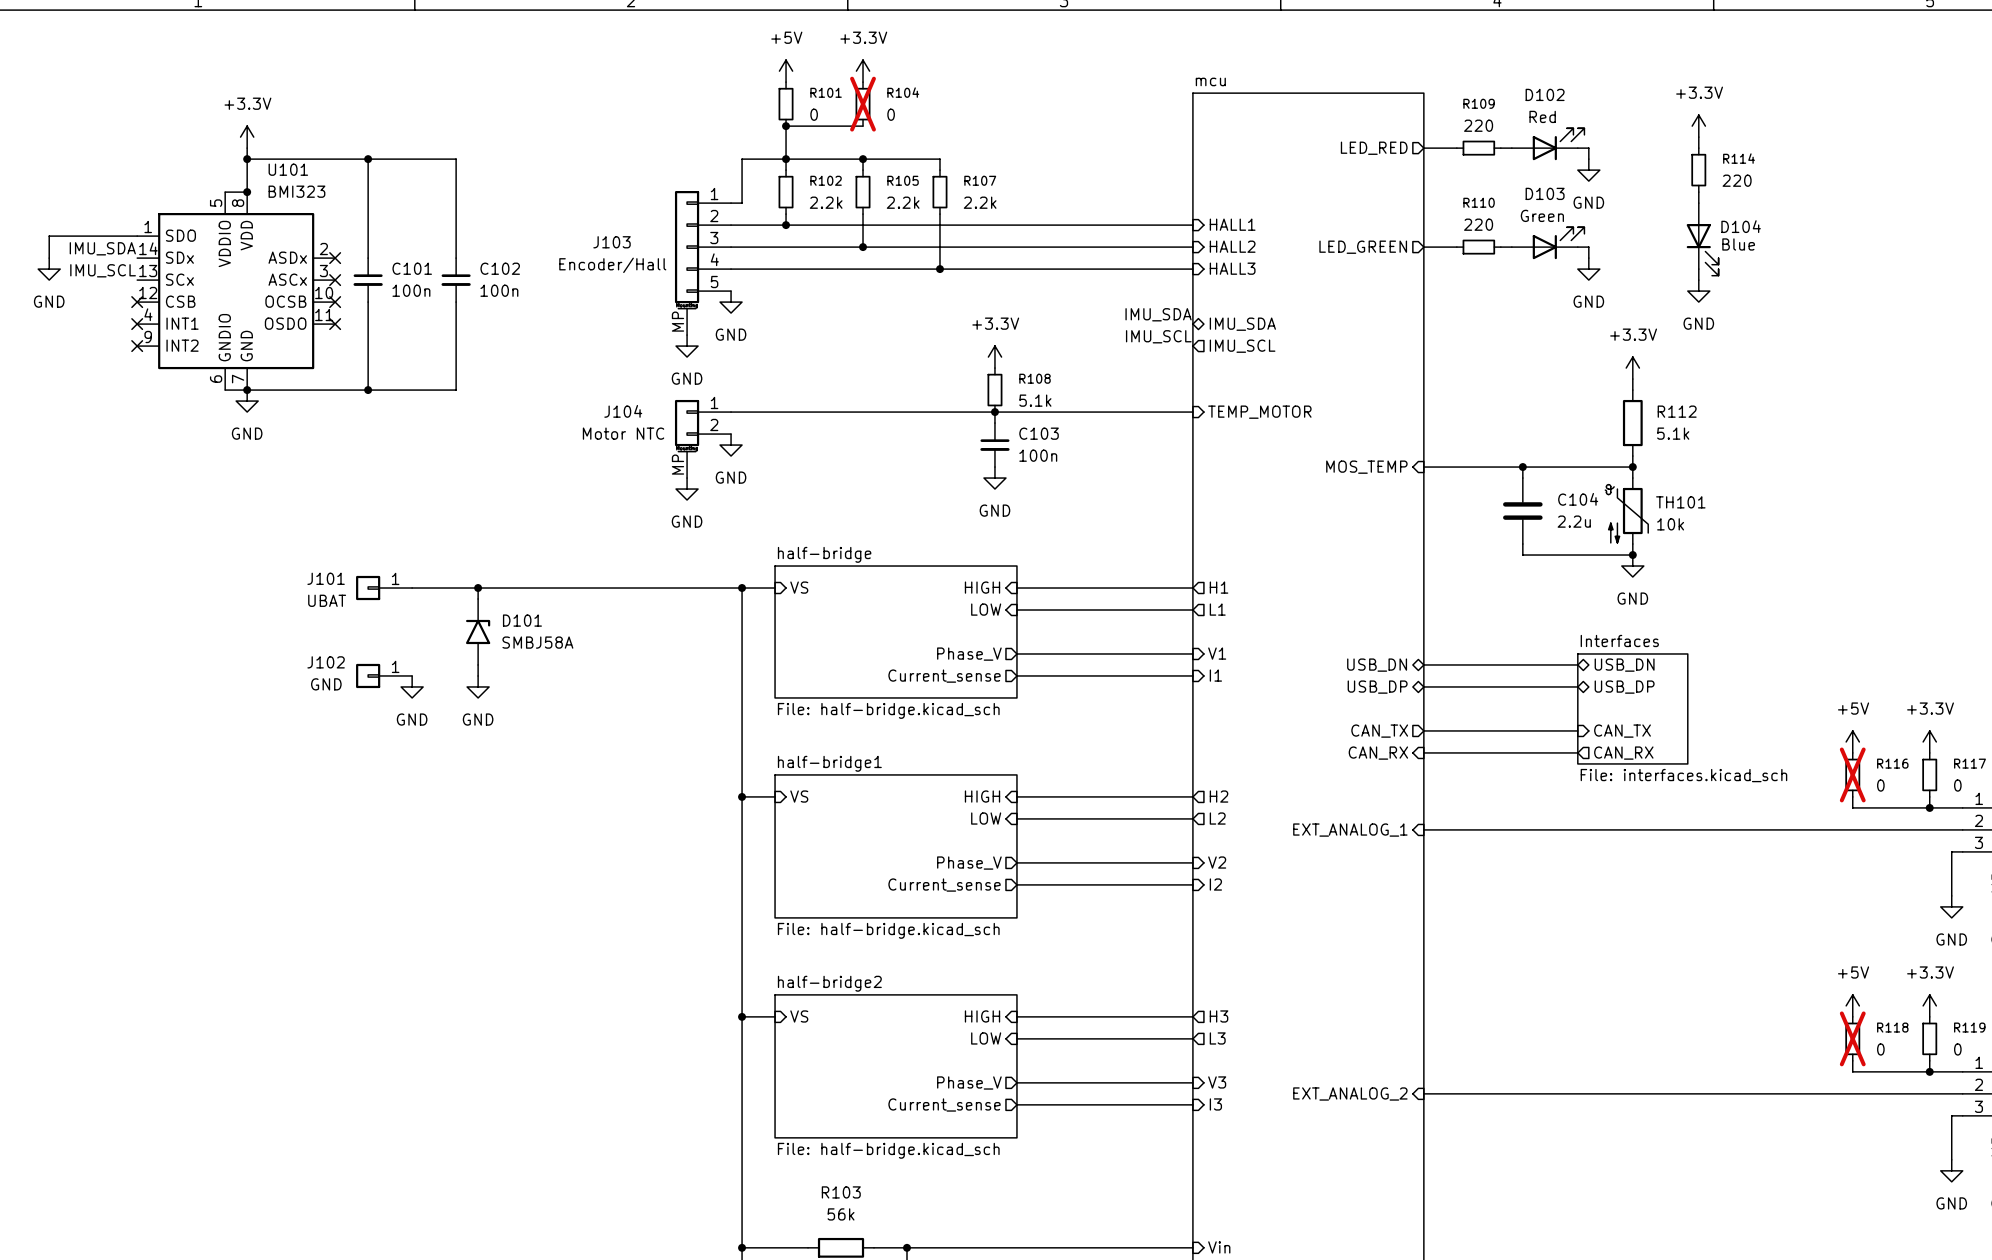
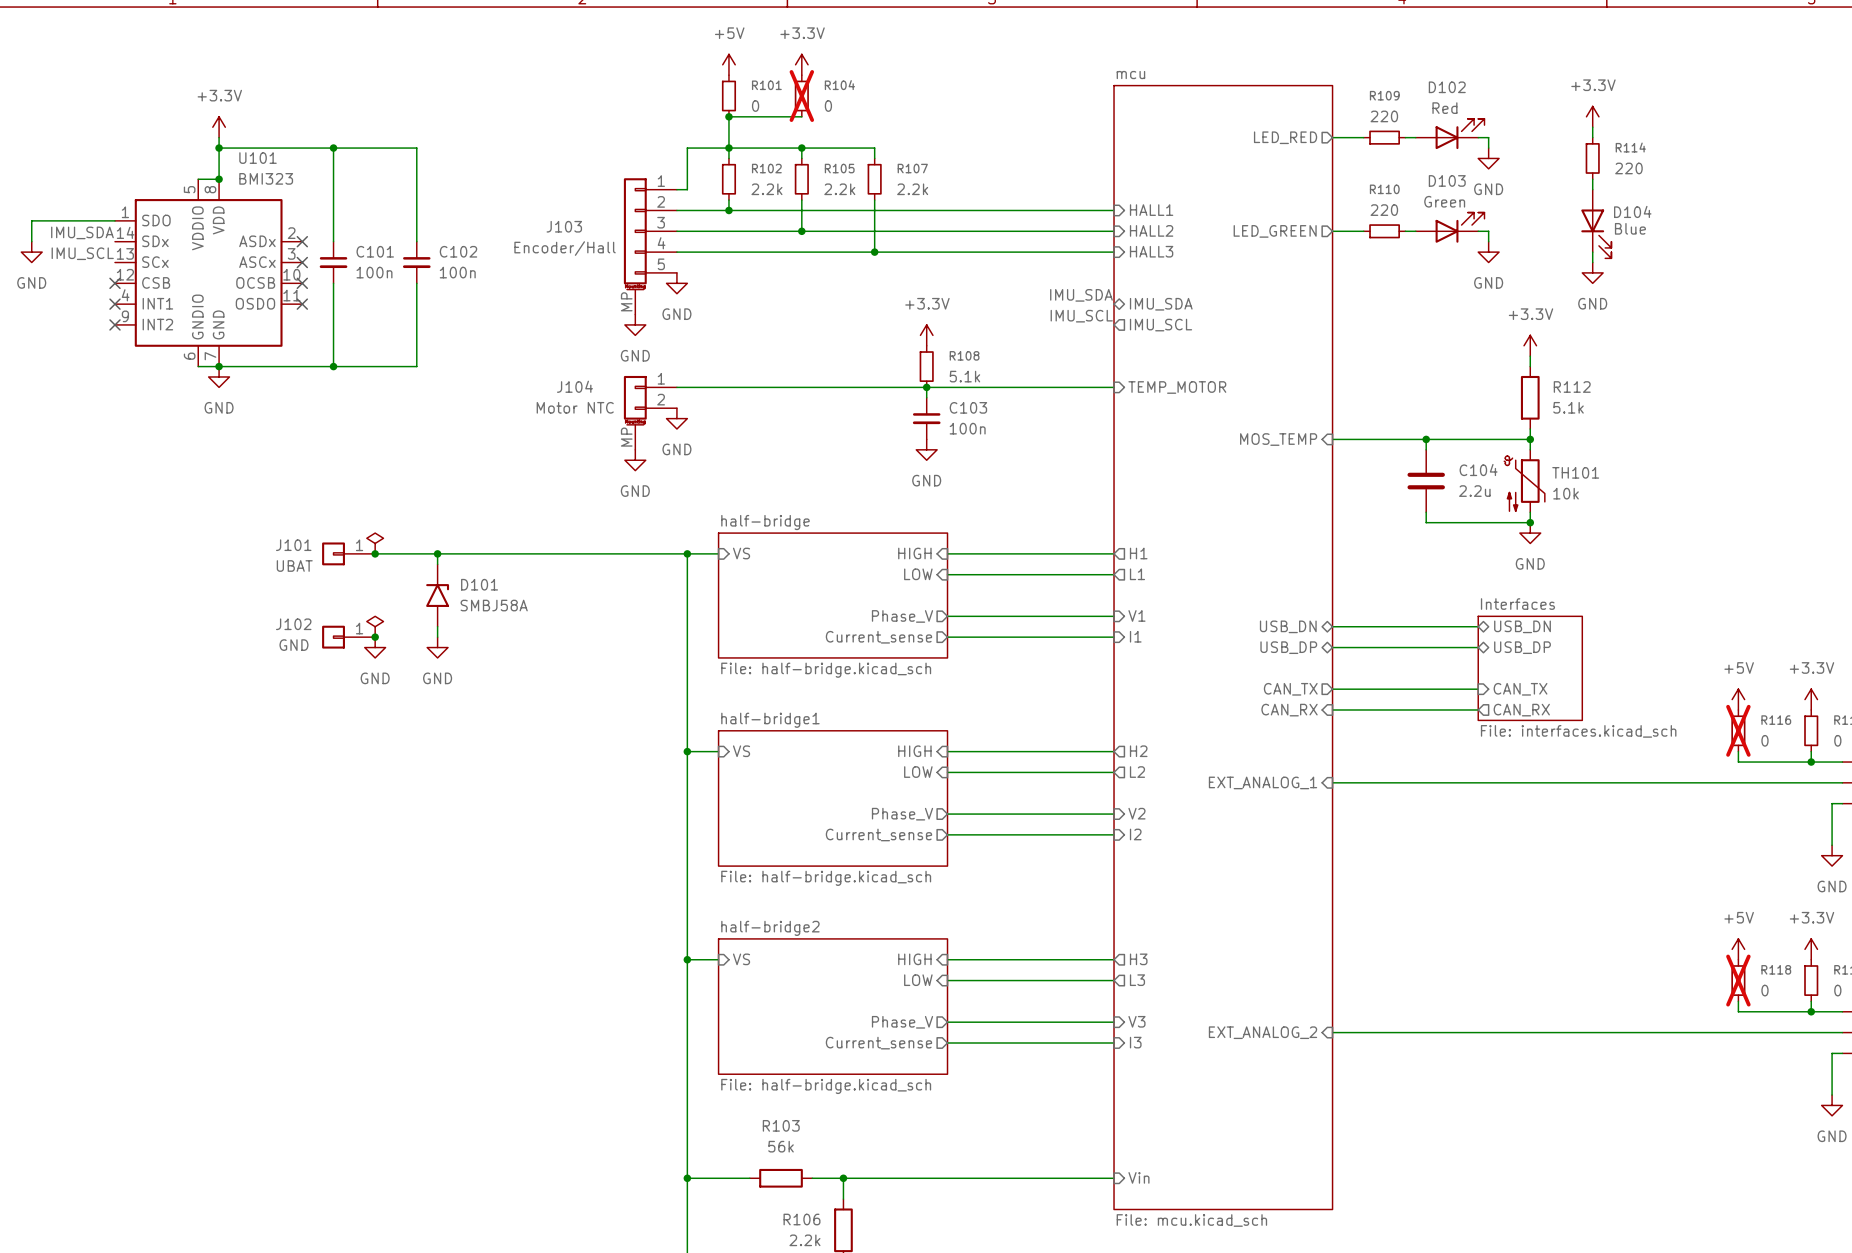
power symbol: none -> (375, 543)
junction: none -> (375, 553)
power symbol: none -> (375, 626)
junction: none -> (375, 637)

